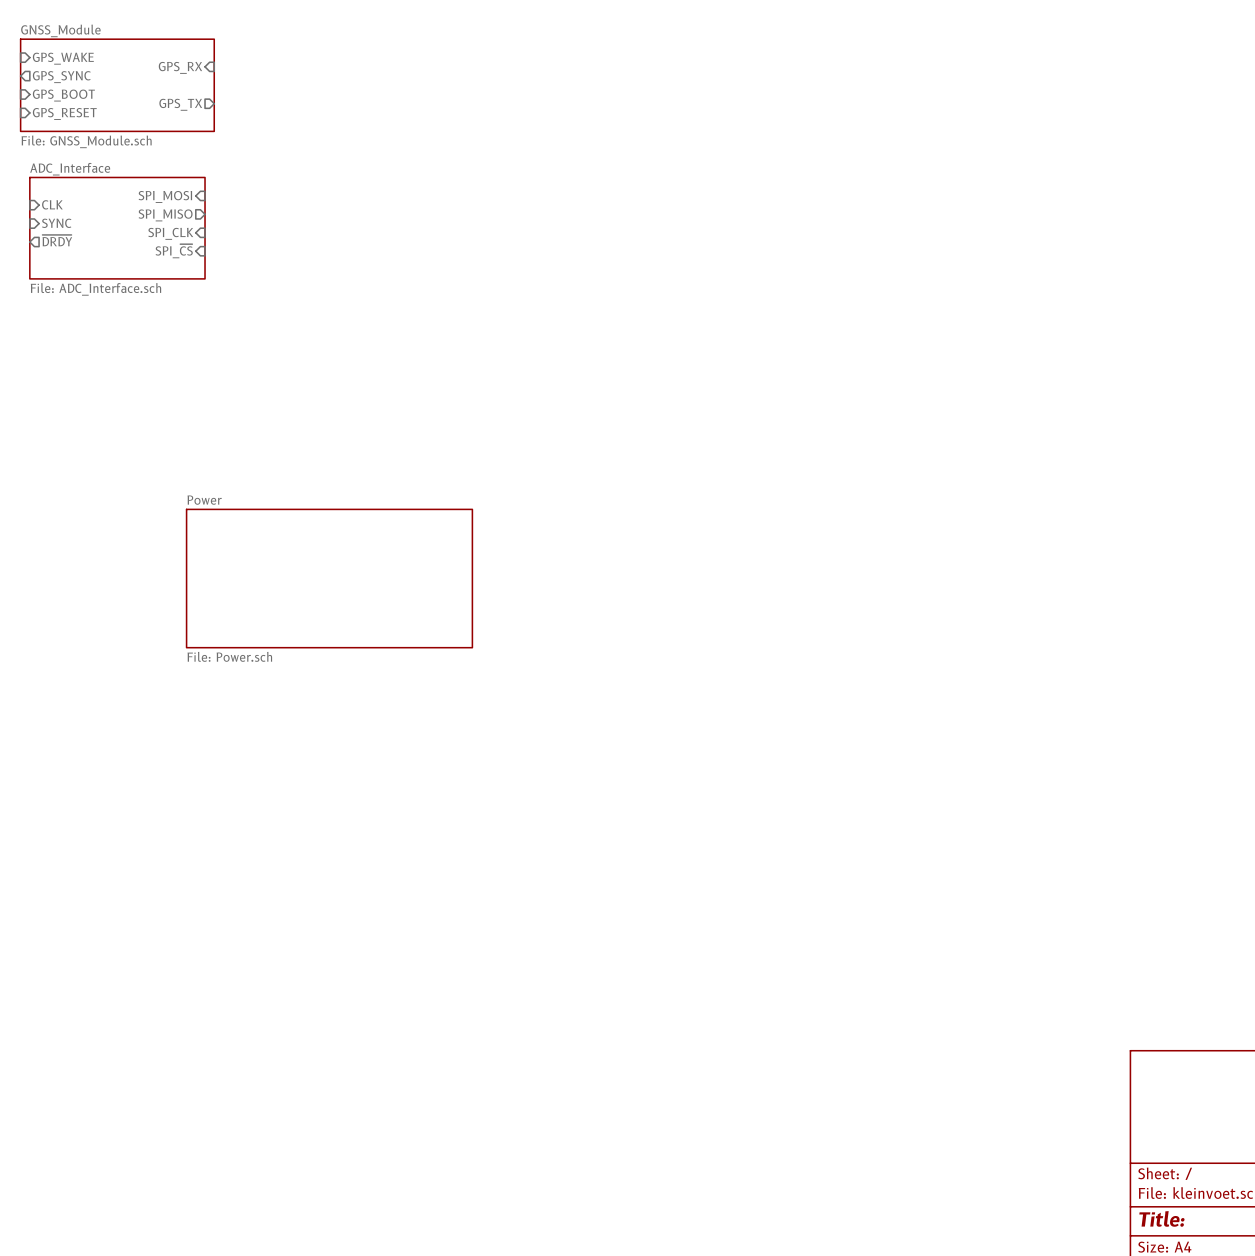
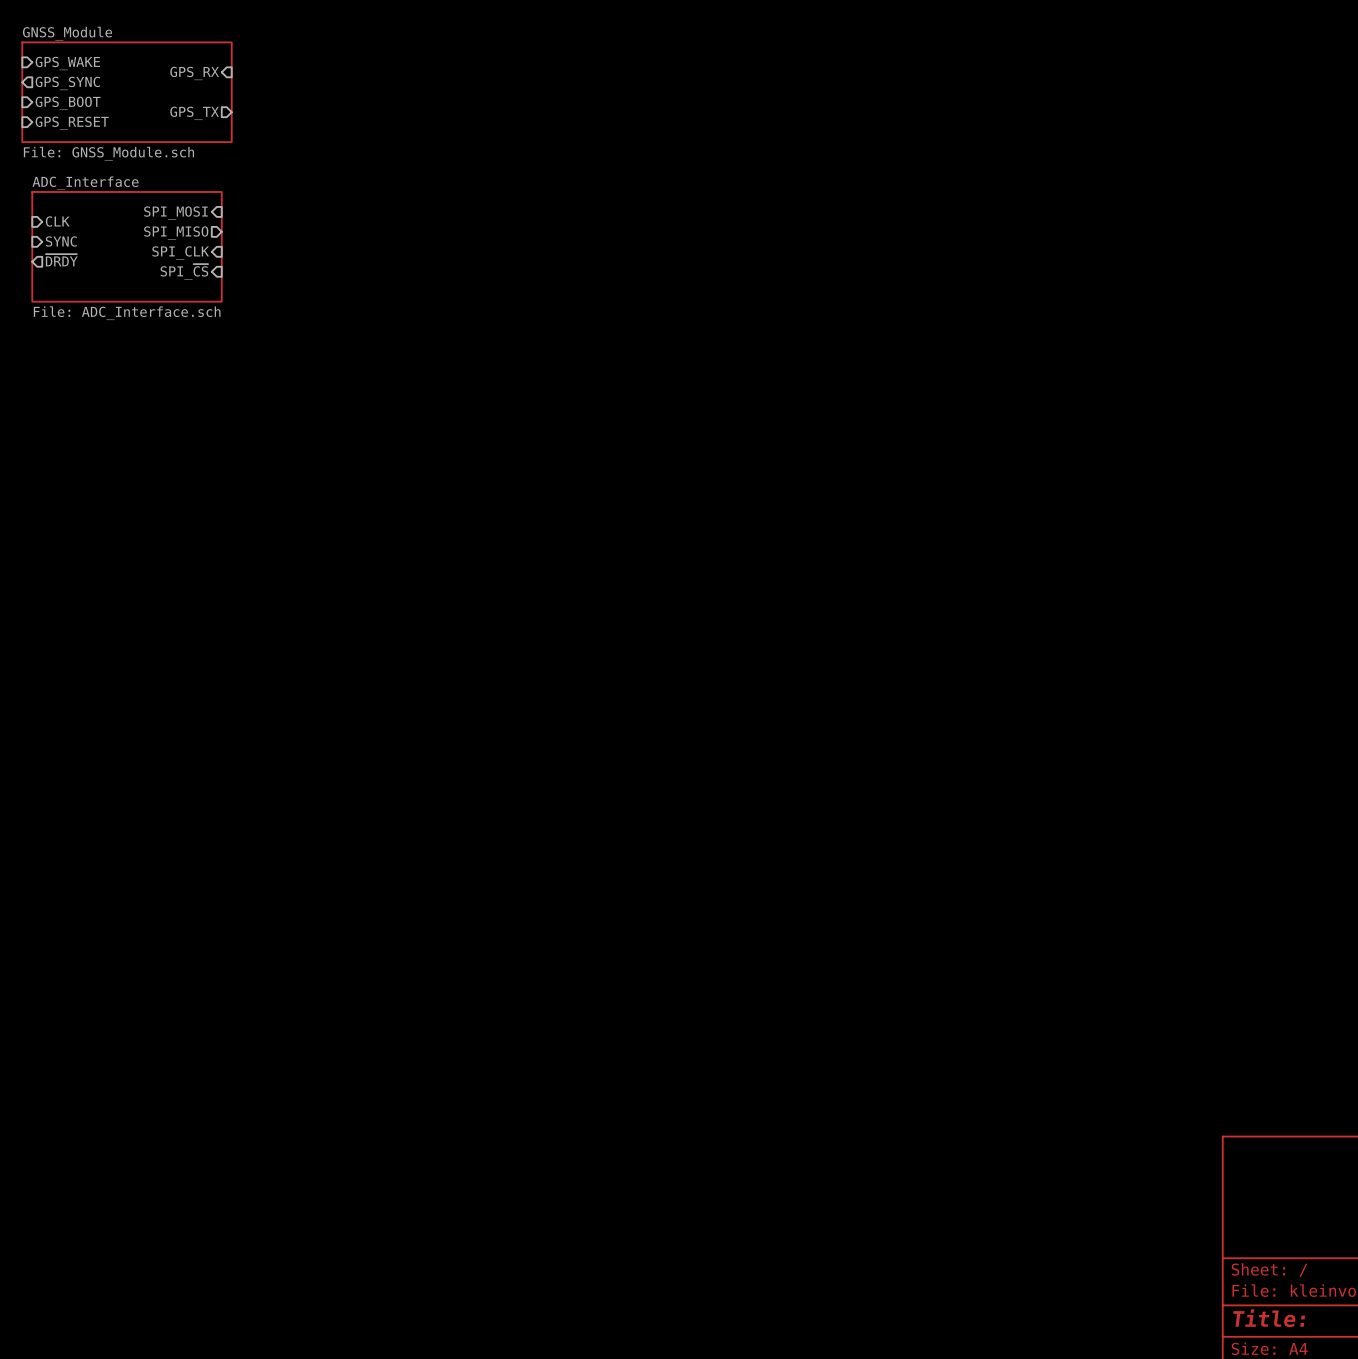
sheet Power: File: Power.sch (329, 578) -> none

